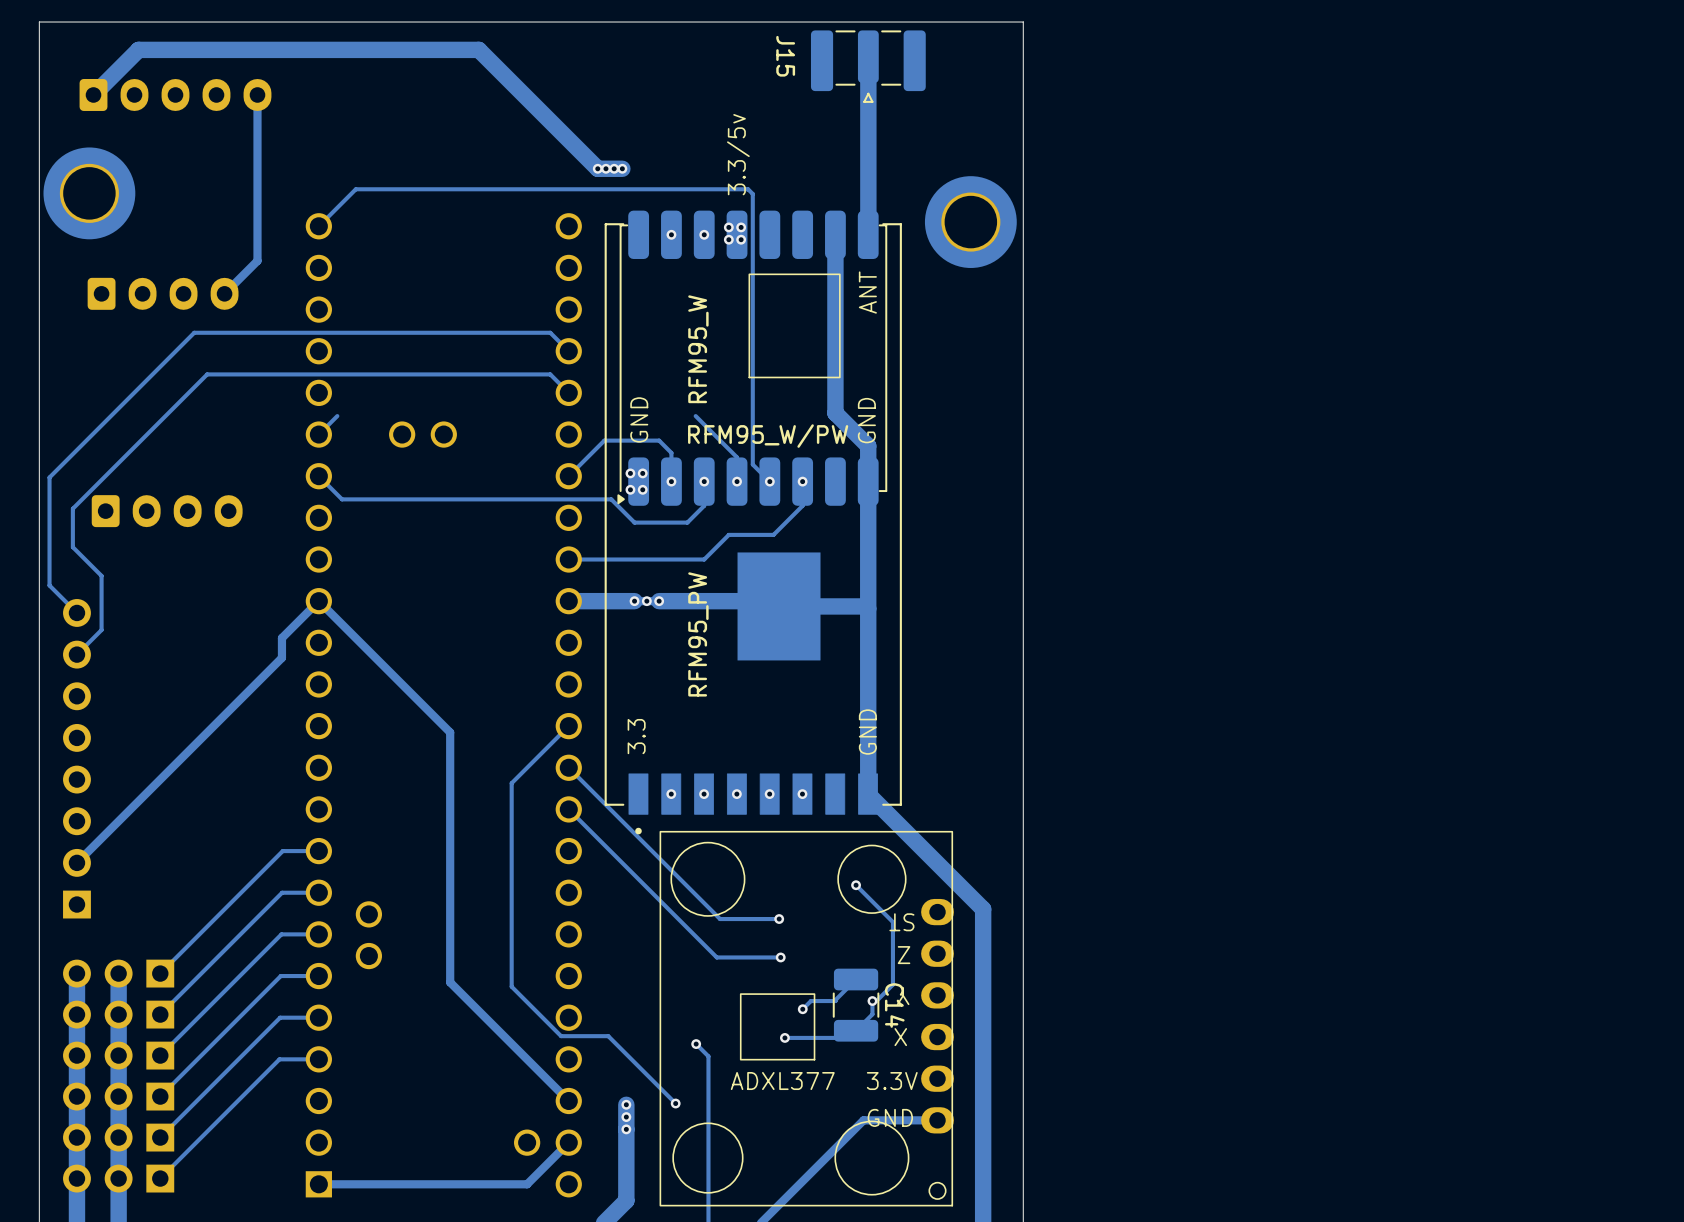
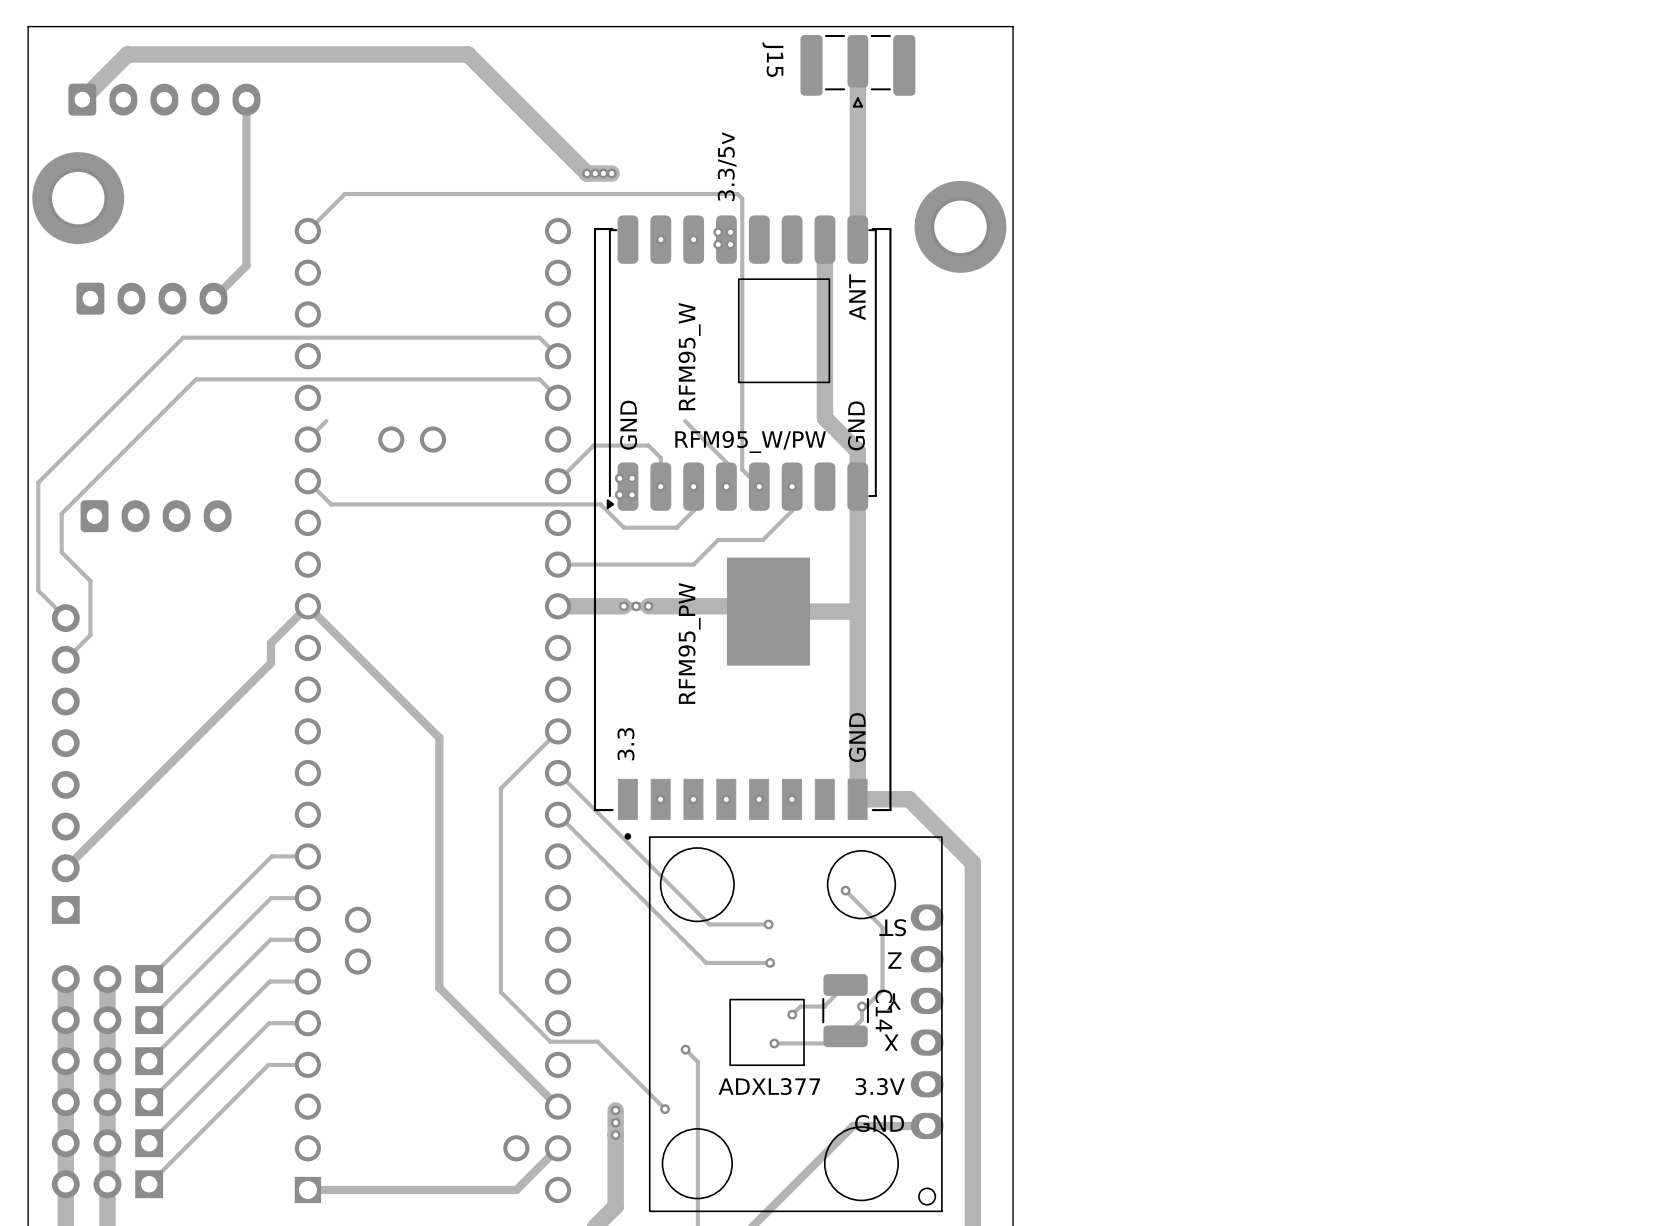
track: (868, 794) (983, 909) -> (857, 799) (909, 799) (972, 862) (972, 914)

